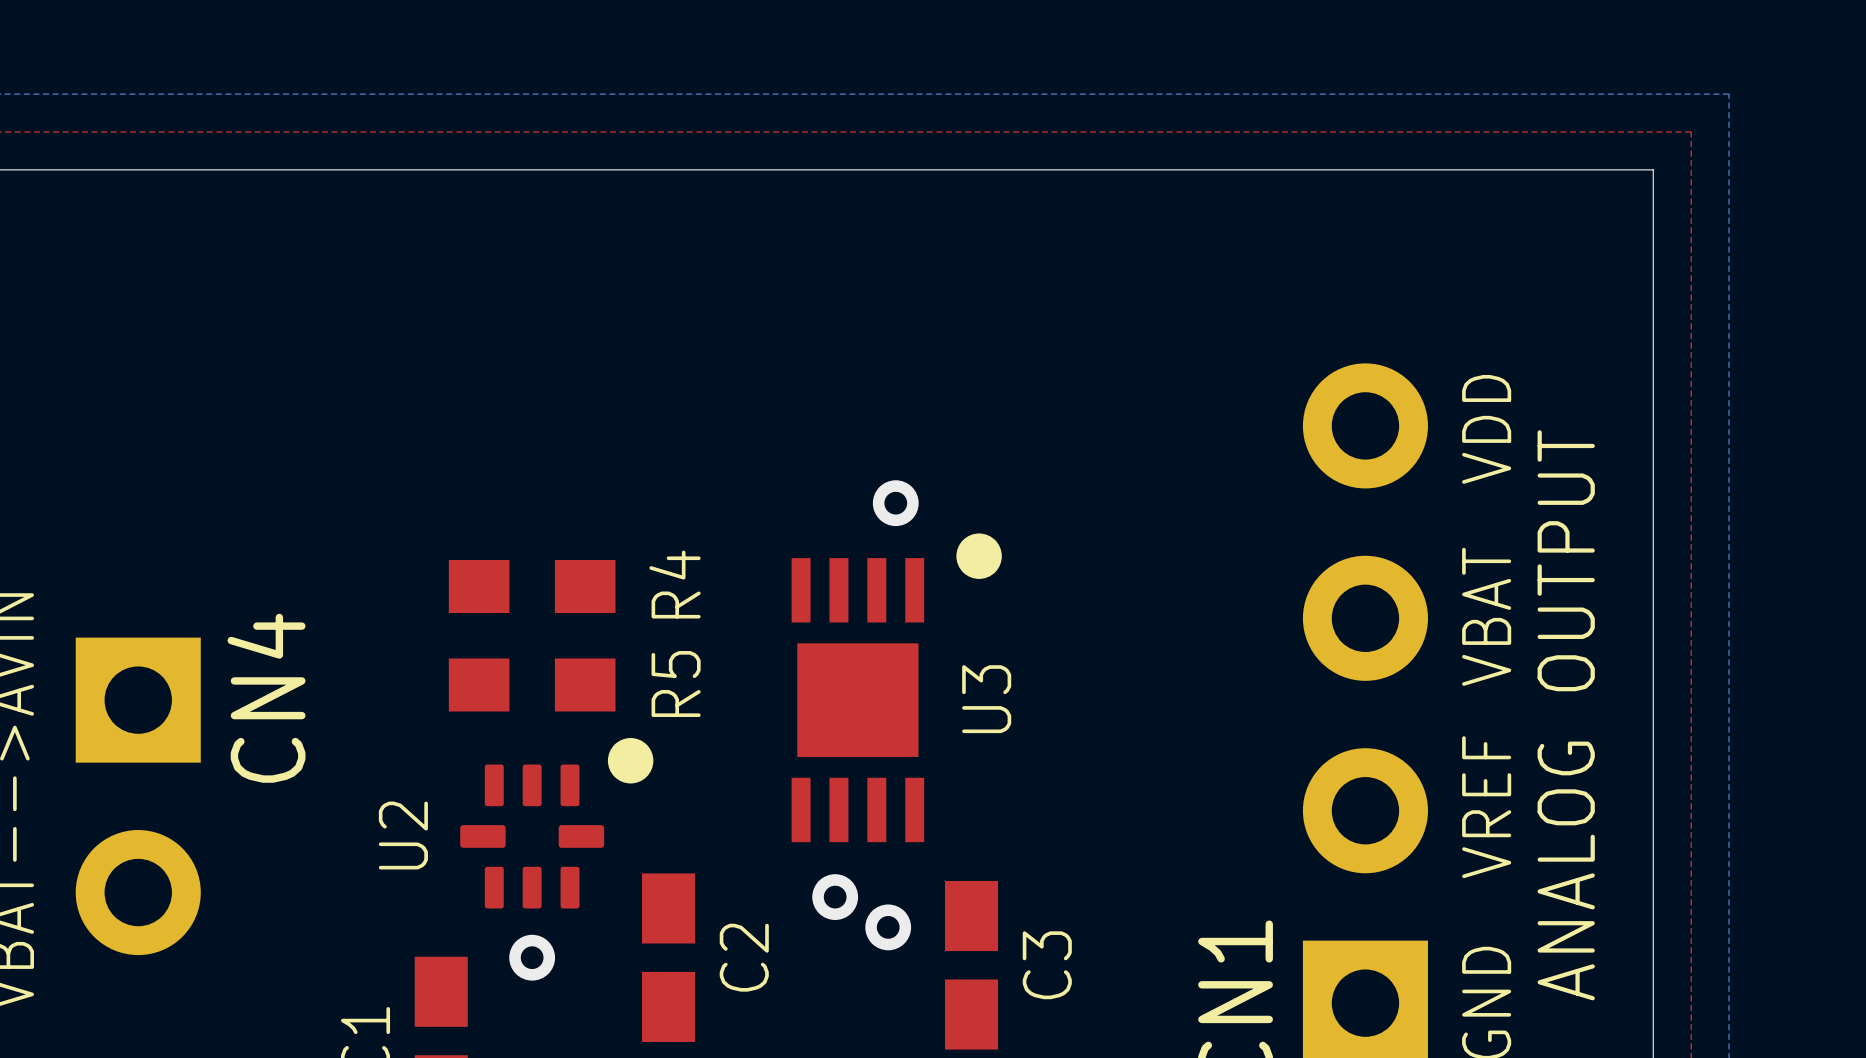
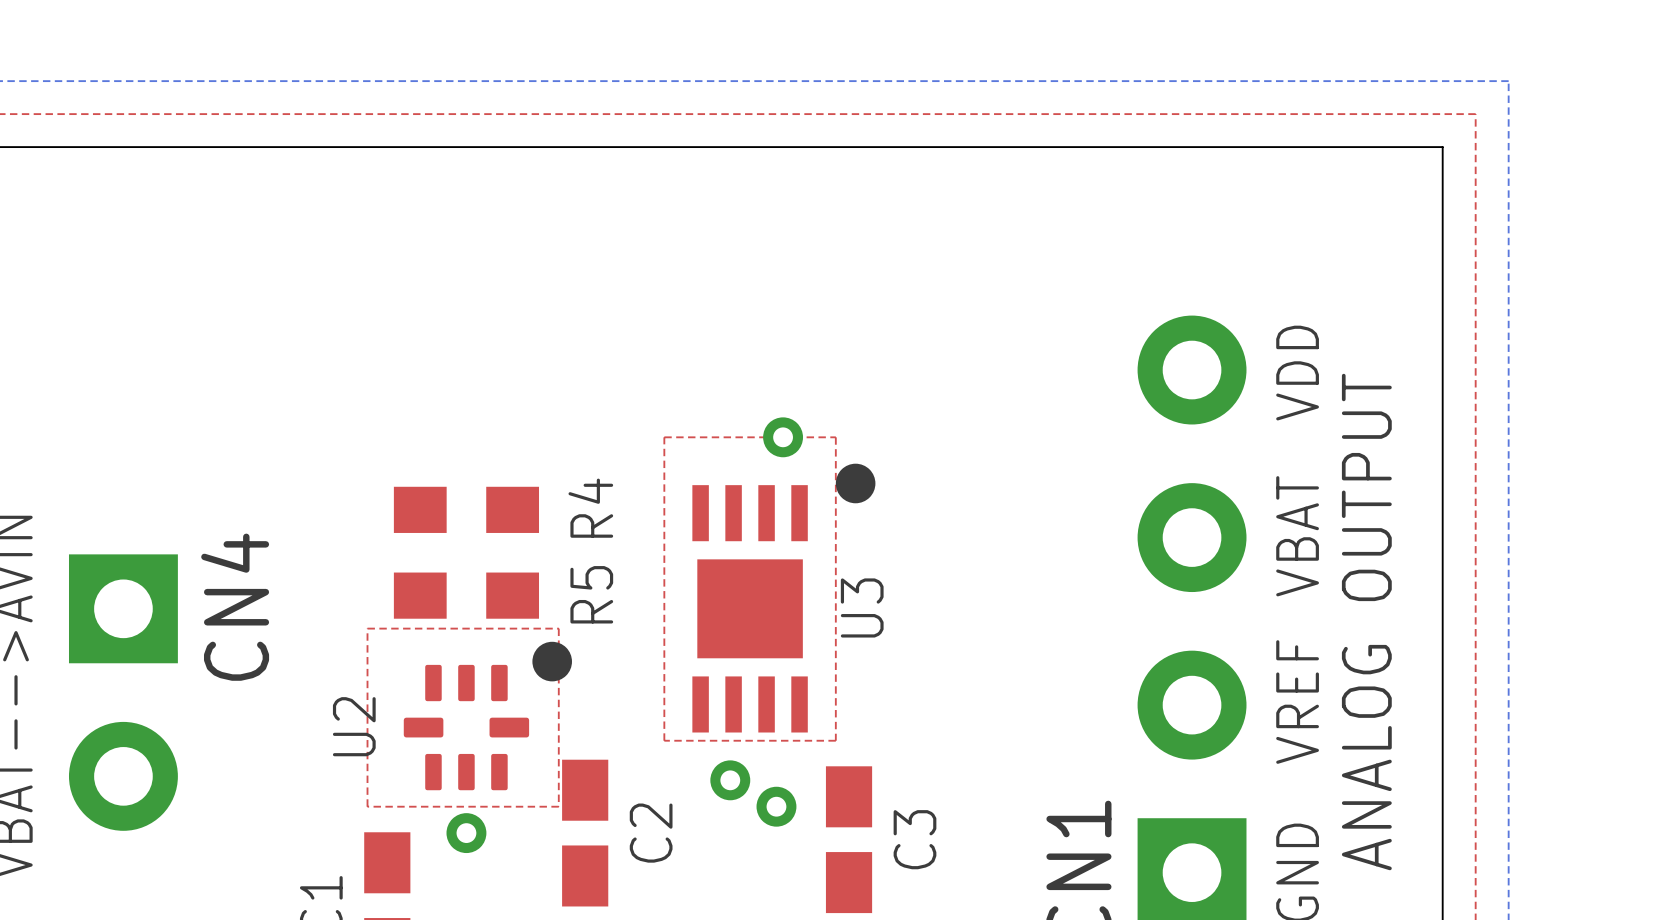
top zone outline: none -> (664, 437) (835, 437) (835, 740) (664, 740) (664, 437)
top zone outline: none -> (367, 628) (558, 628) (558, 806) (367, 806) (367, 628)

